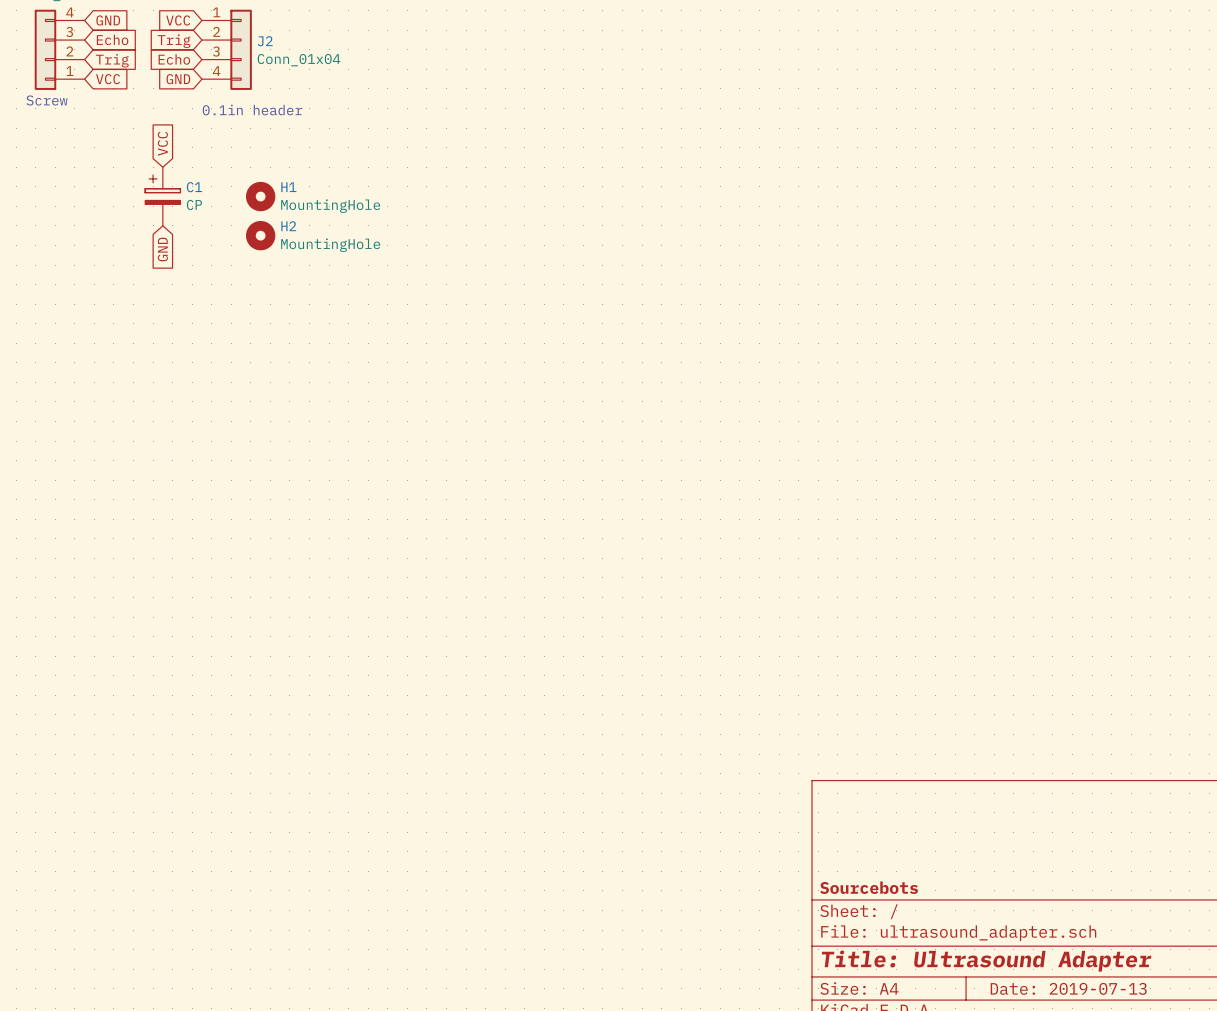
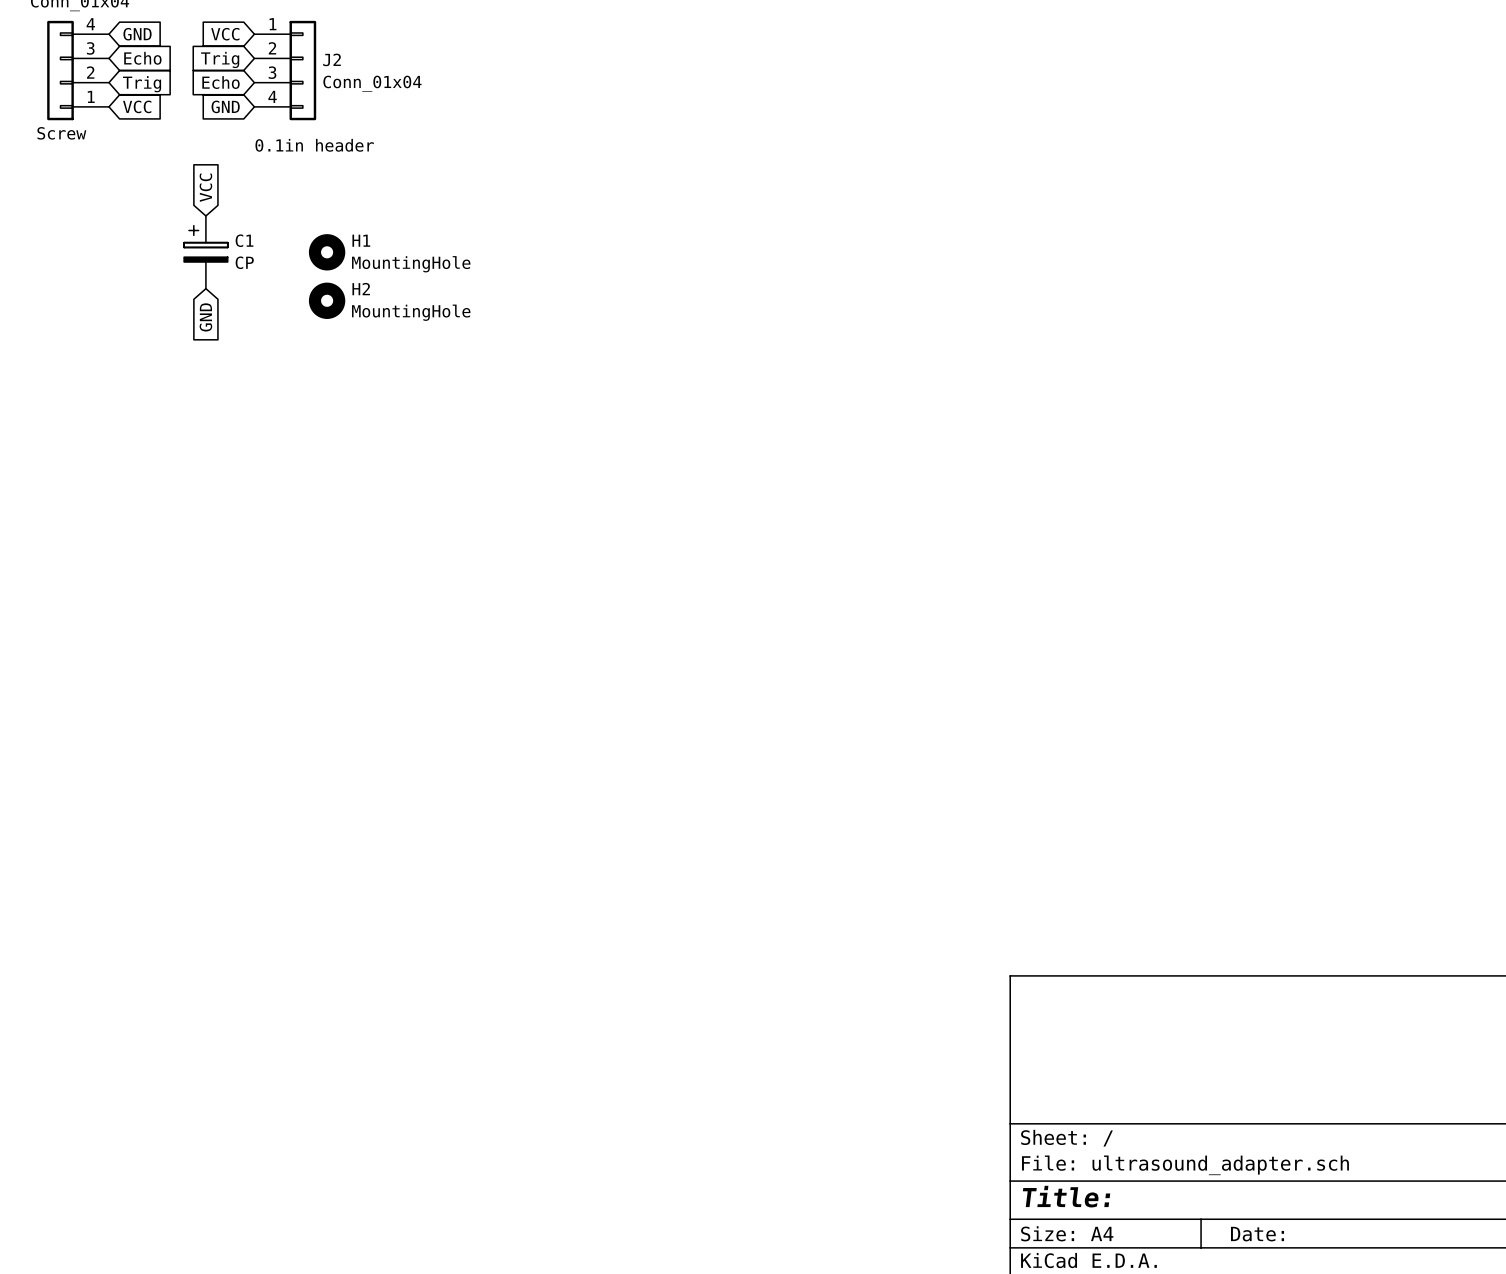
title block: Sourcebots (869, 887) -> none
title block: Title: Ultrasound Adapter (986, 961) -> Title: (1066, 1196)
title block: Date: 2019-07-13 (1068, 988) -> Date: (1257, 1234)

